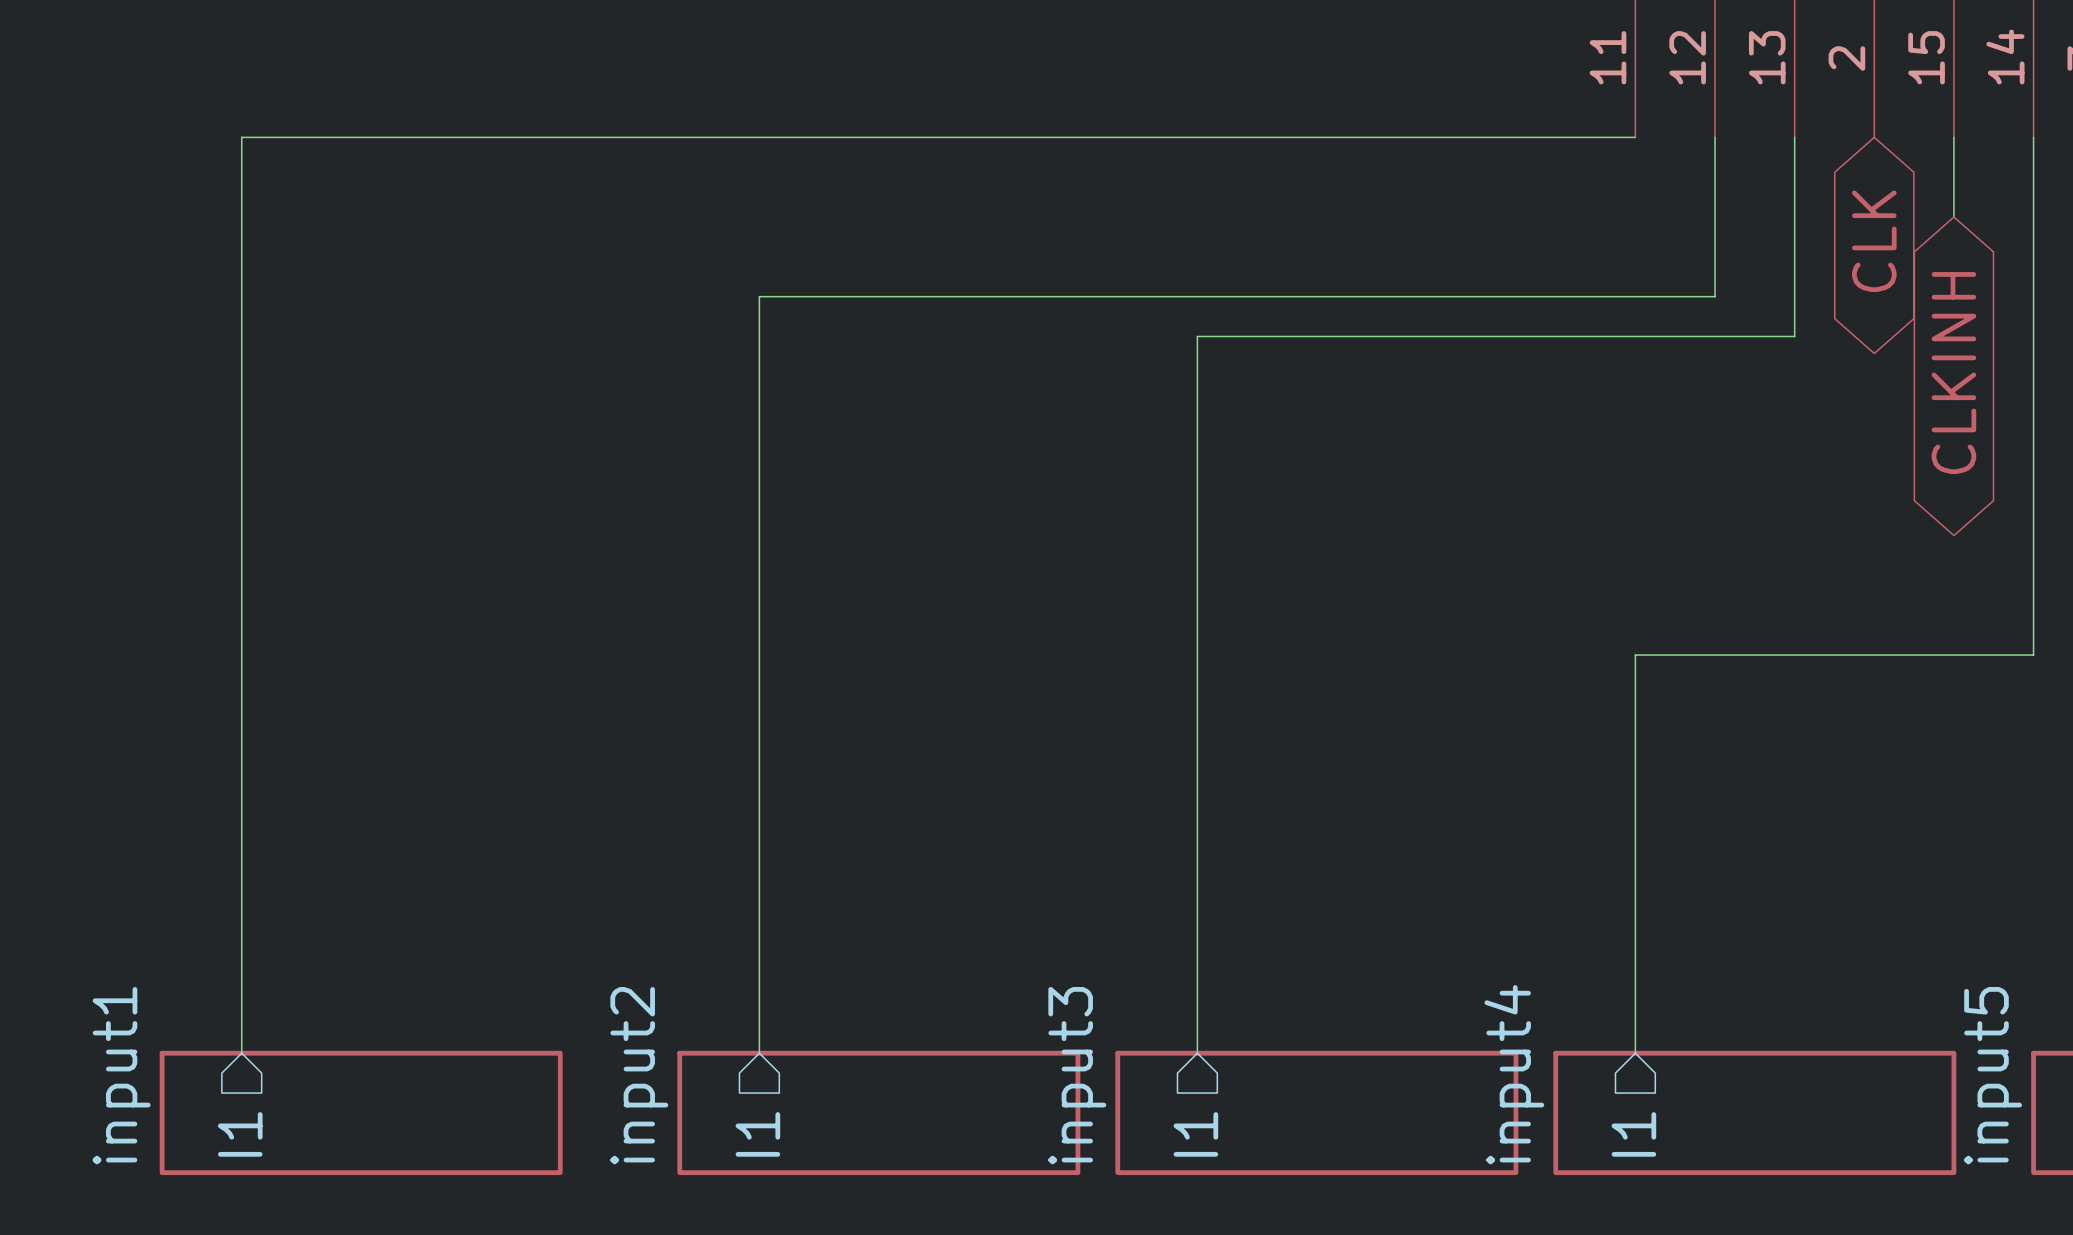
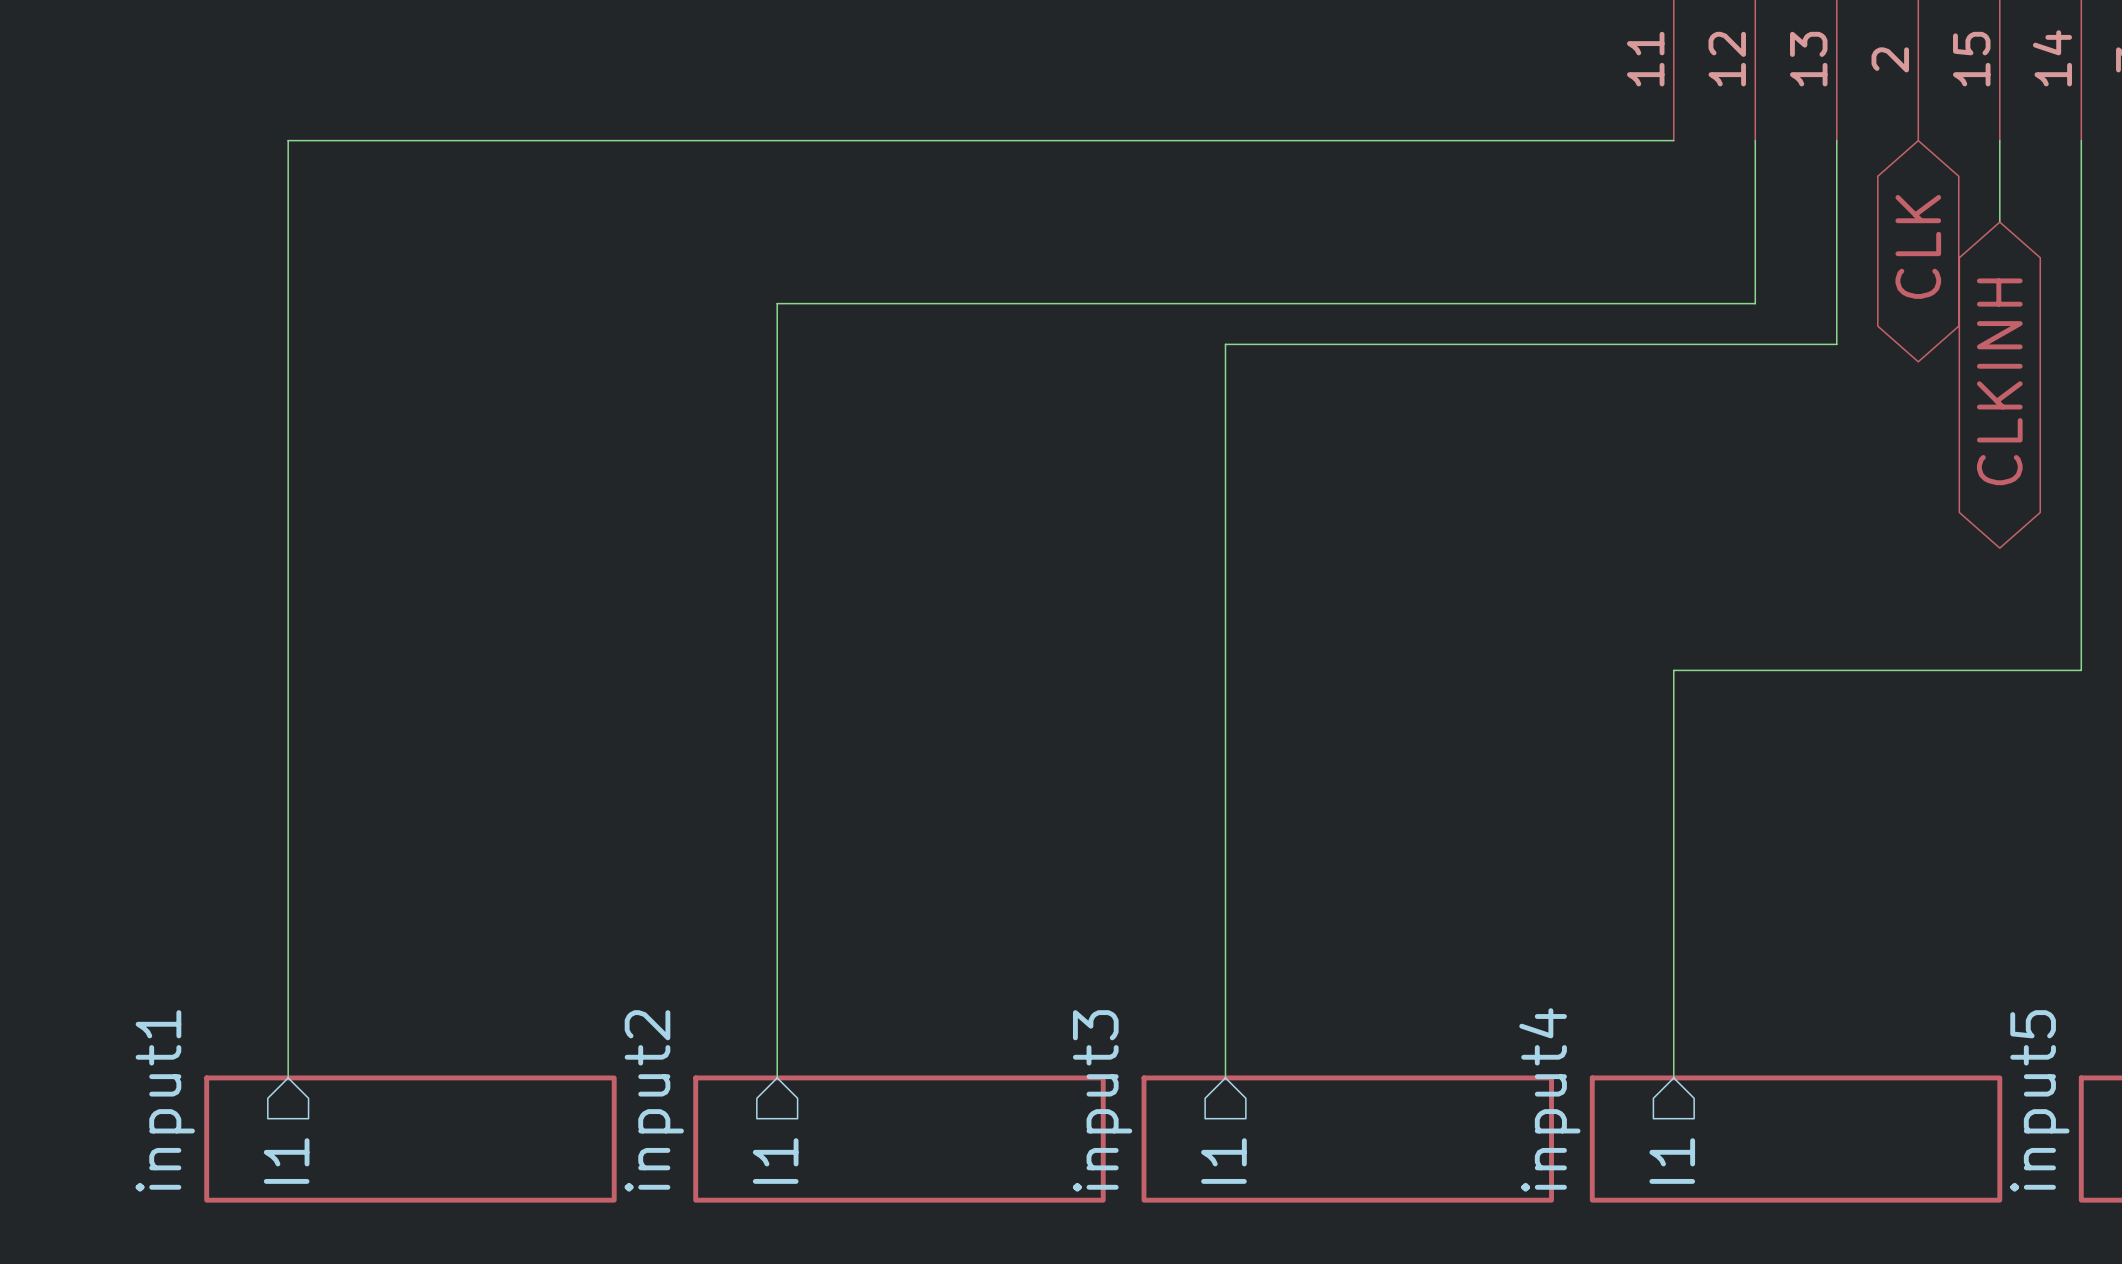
wire: (281, 137) (241, 137) (241, 1053) -> (288, 140) (288, 1077)
sheet input1 position: (361, 1112) -> (410, 1139)
sheet pin position: I1 (240, 1134) -> I1 (286, 1161)

